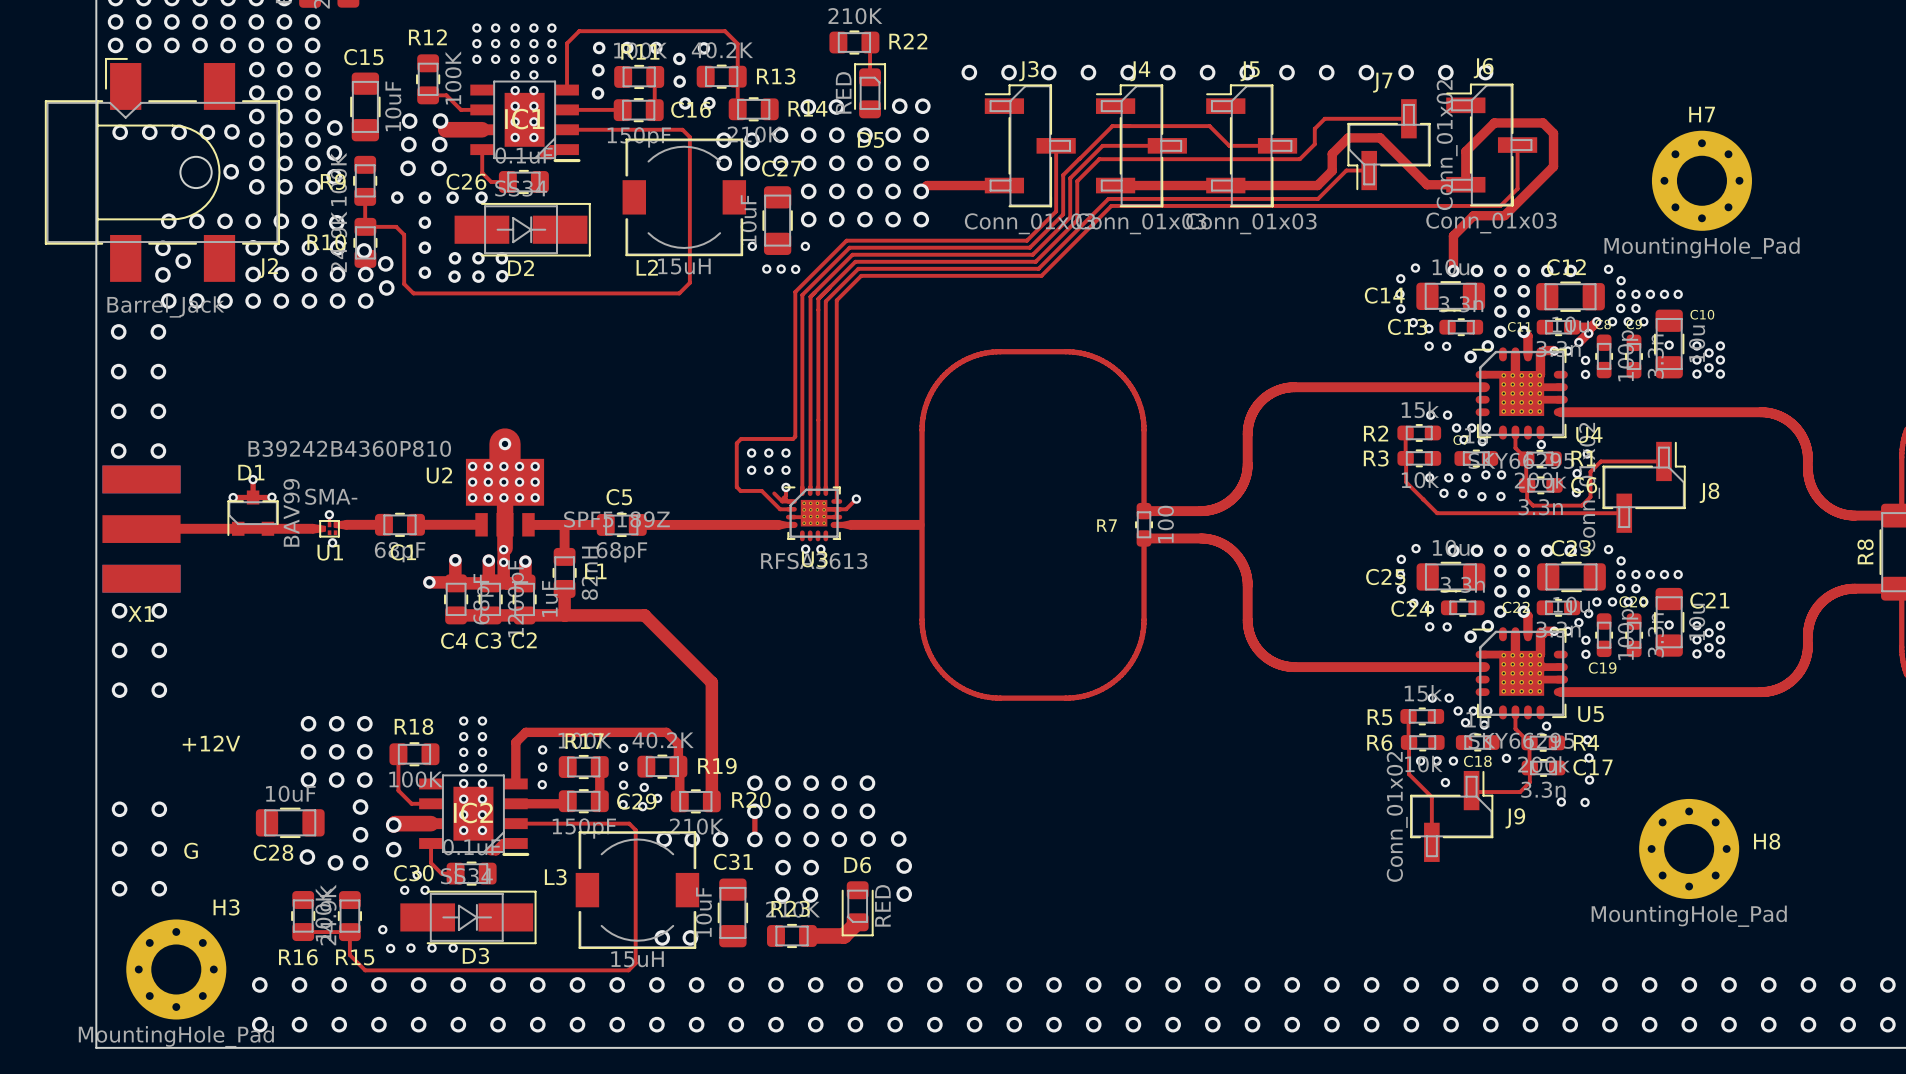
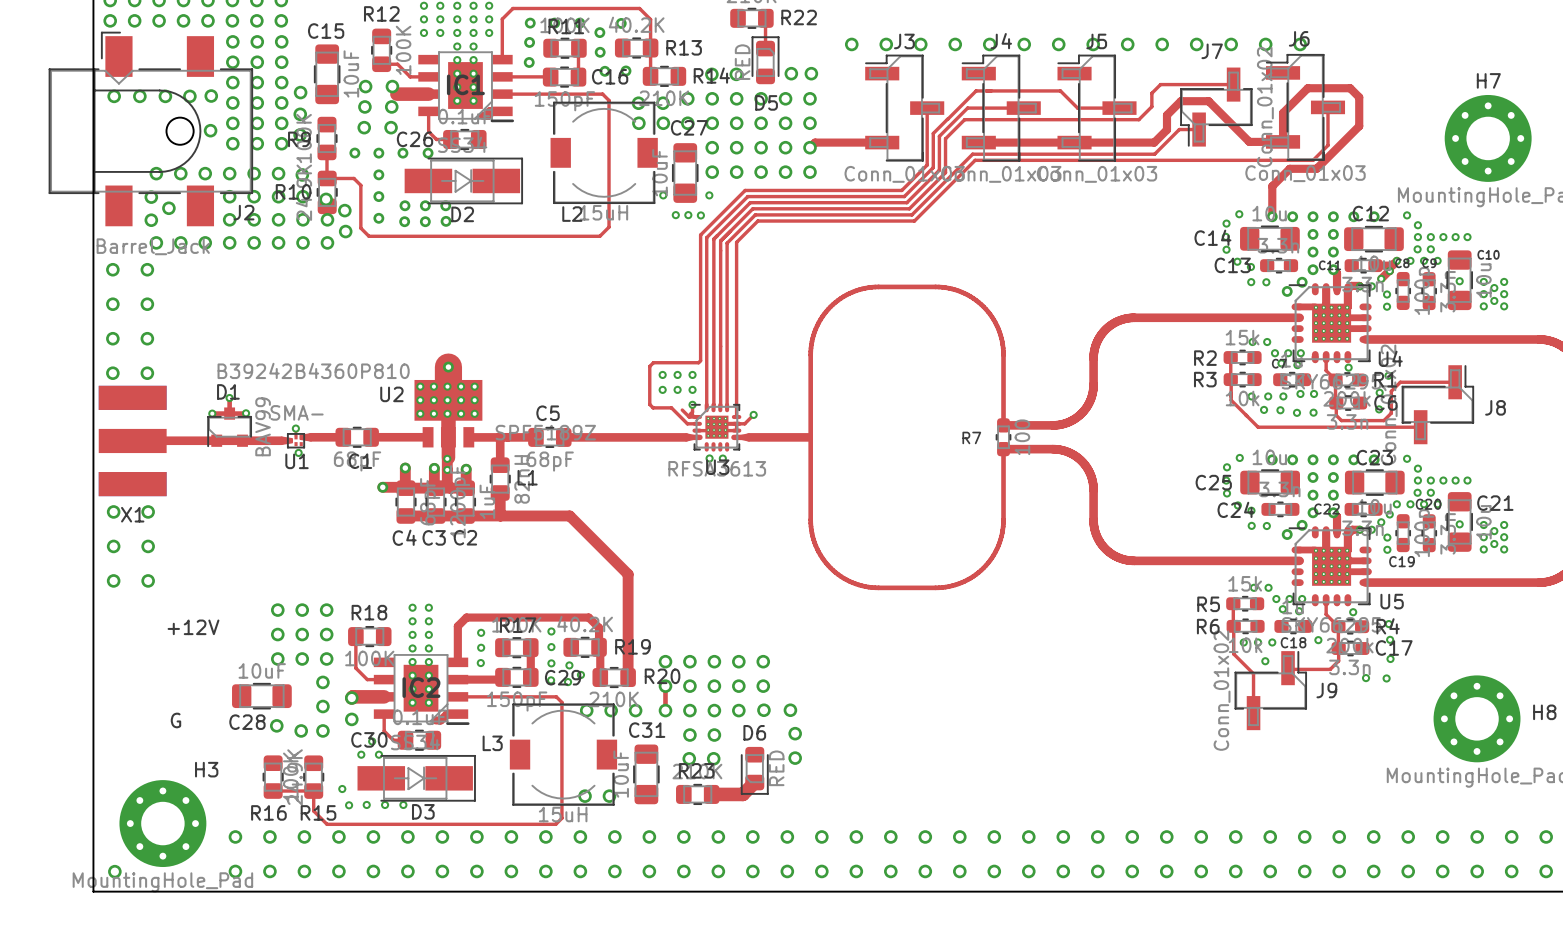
via: (119, 809) -> none
via: (159, 809) -> none
via: (119, 849) -> none
via: (159, 849) -> none
via: (119, 888) -> none
via: (159, 888) -> none
via: none -> (114, 871)

